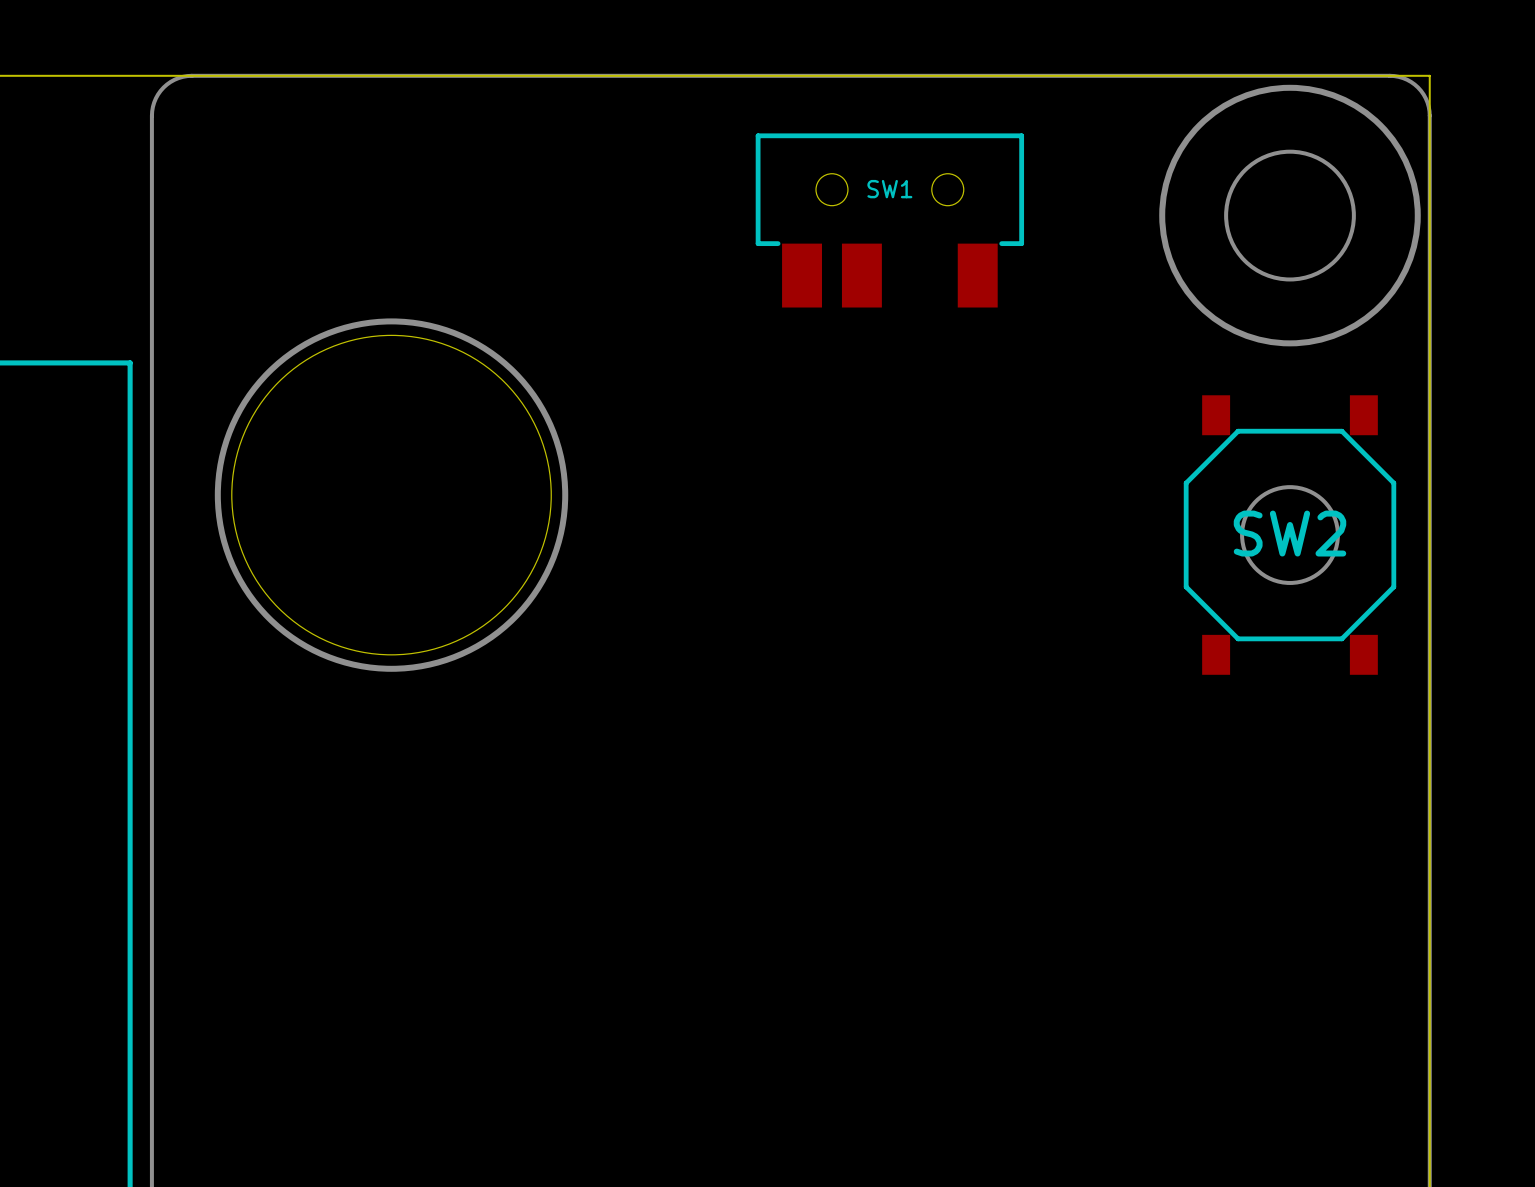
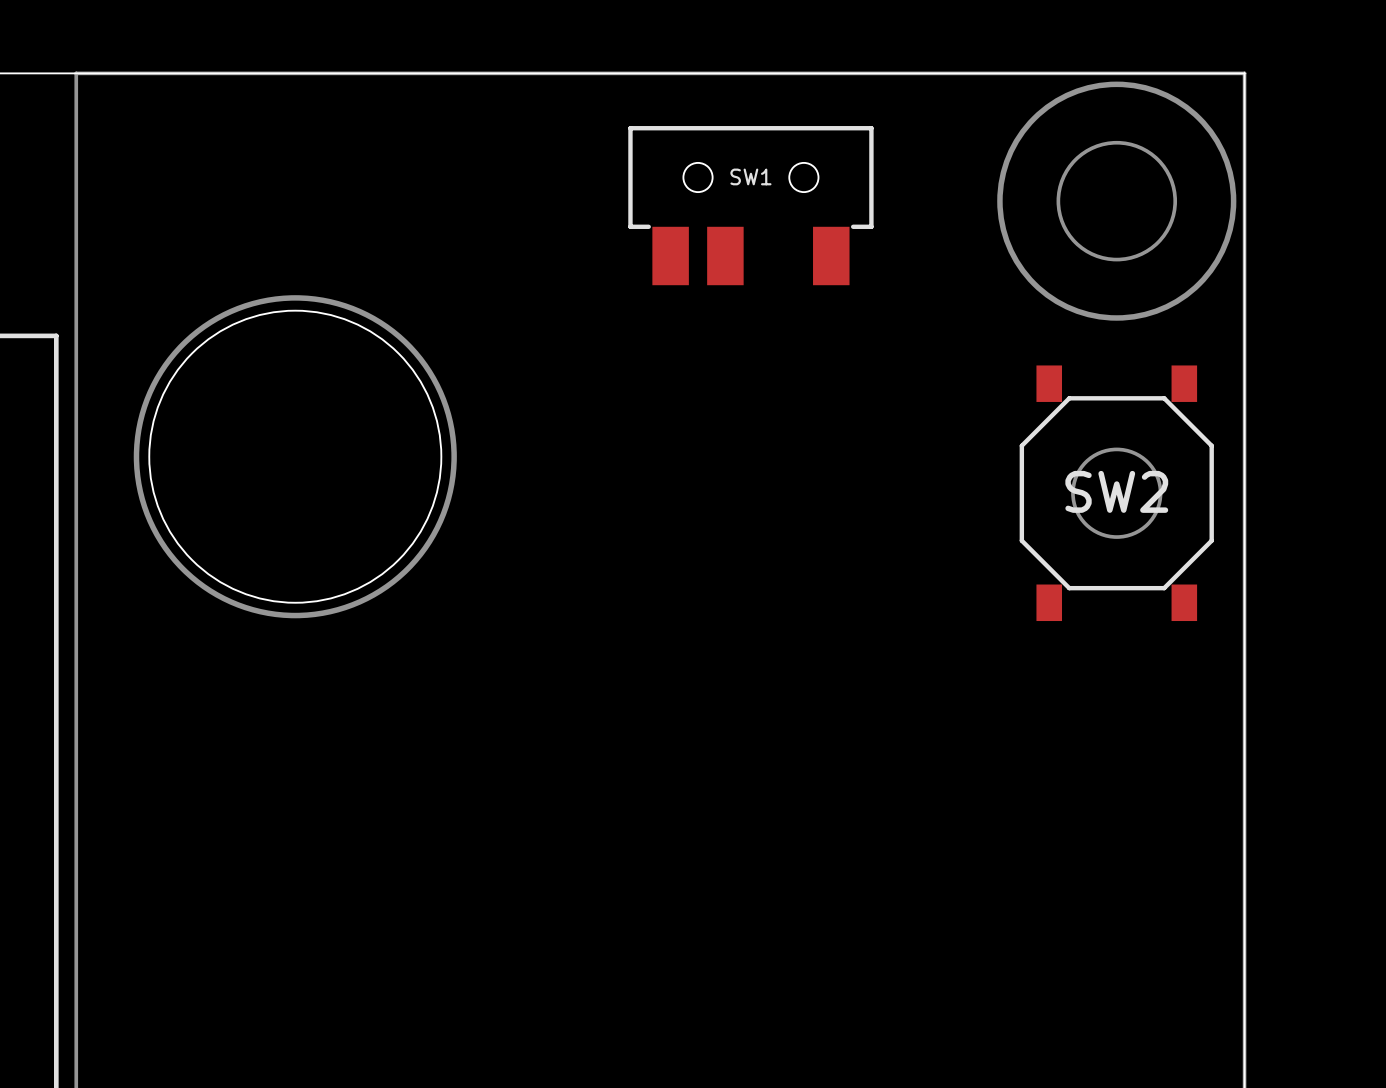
line: (191, 75) (178, 78) (163, 87) (154, 102) (151, 115) -> (112, 73) (76, 73) (76, 109)
line: (1389, 75) (1407, 79) (1418, 87) (1425, 98) (1429, 115) -> (1208, 73) (1244, 73) (1244, 109)

